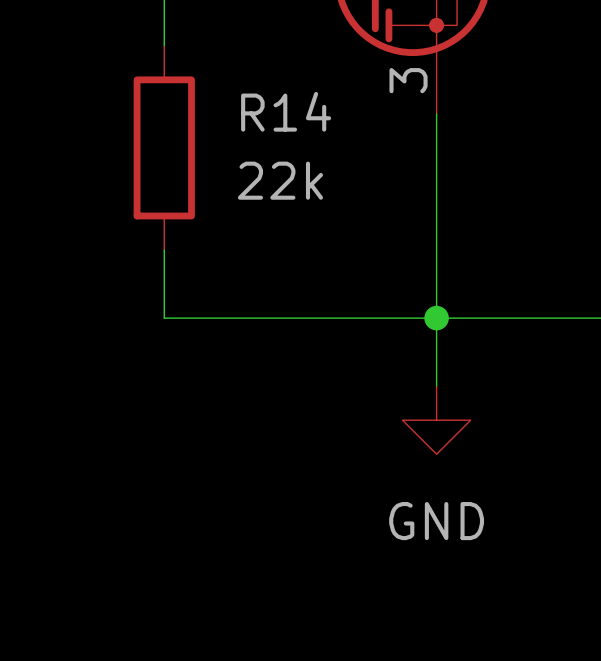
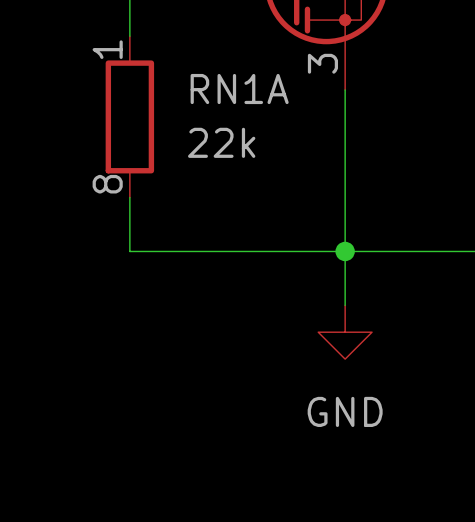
R14 pin number: none -> 1 (107, 49)
R14 name: R14 (286, 111) -> RN1A (239, 89)
R14 pin number: none -> 8 (107, 184)

